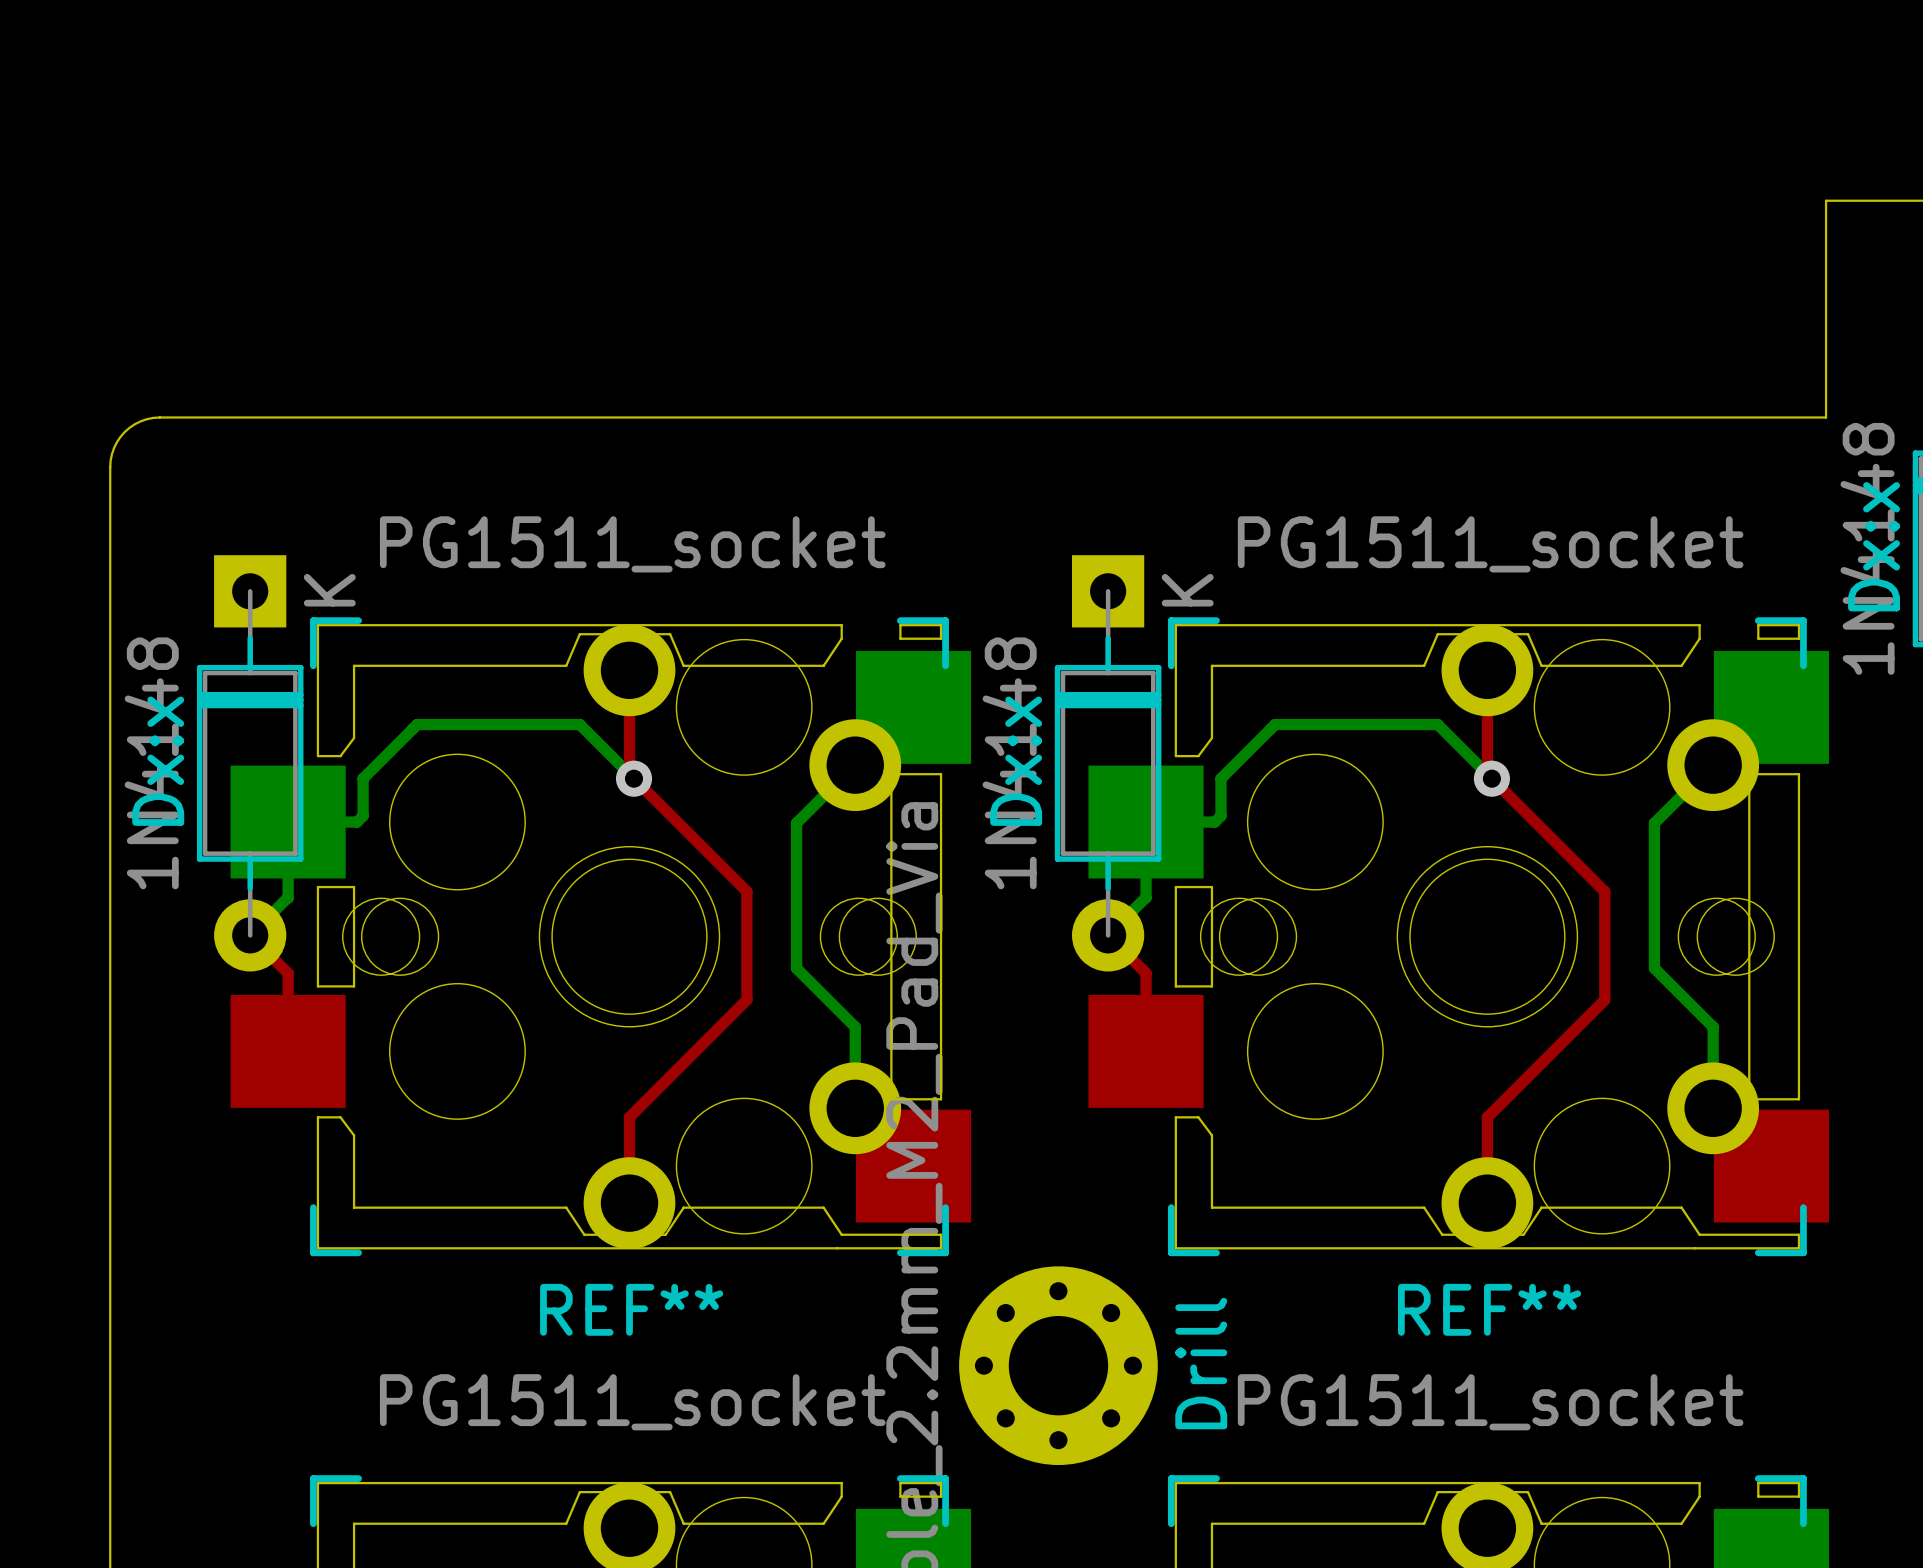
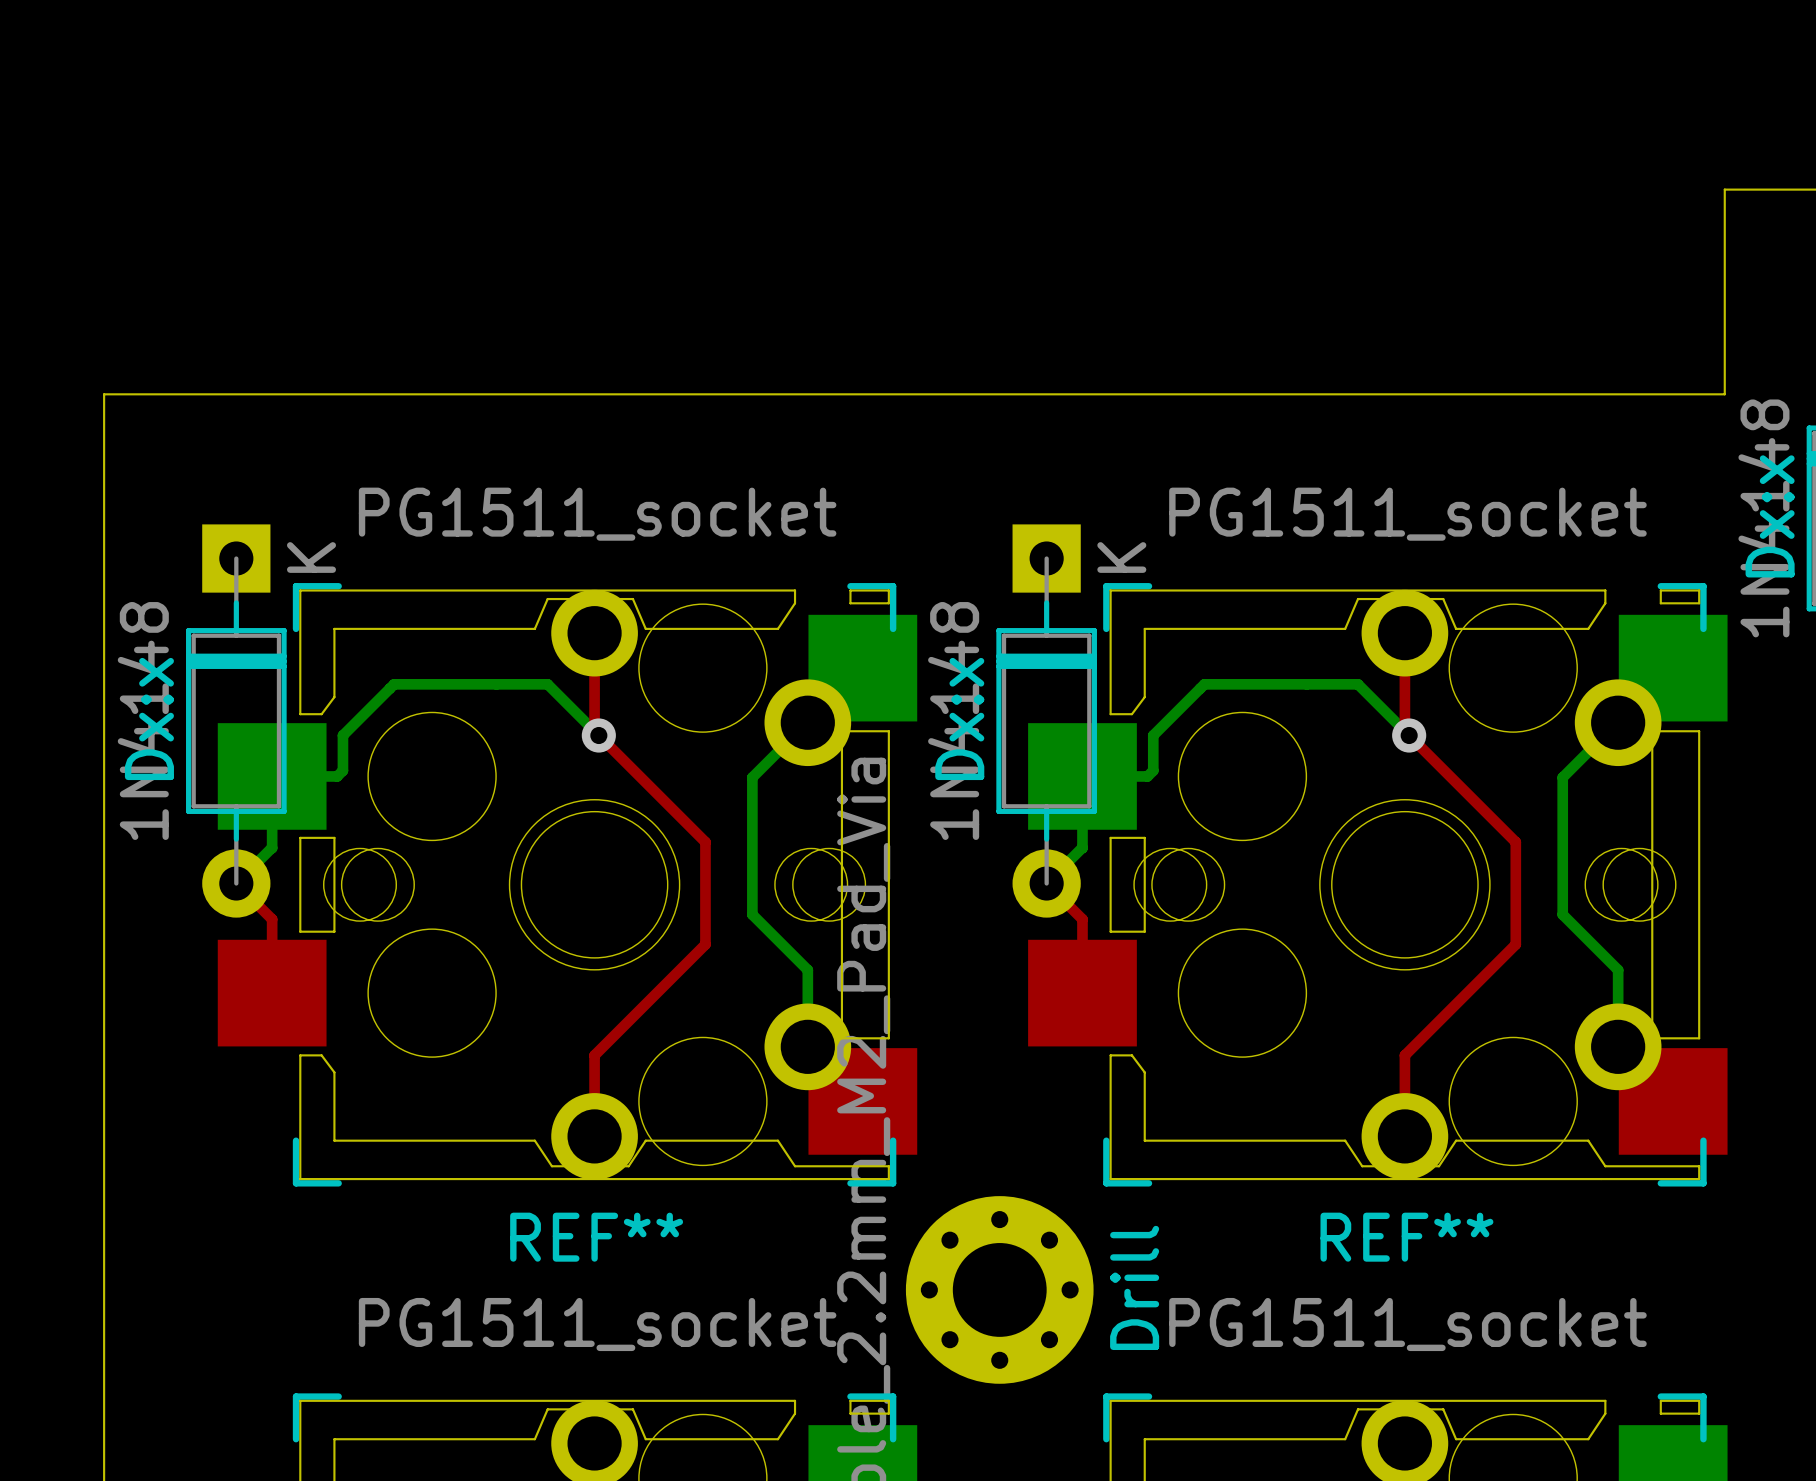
board edge: (159, 417) (140, 421) (124, 432) (114, 448) (110, 467) -> (151, 394) (104, 394) (104, 441)

